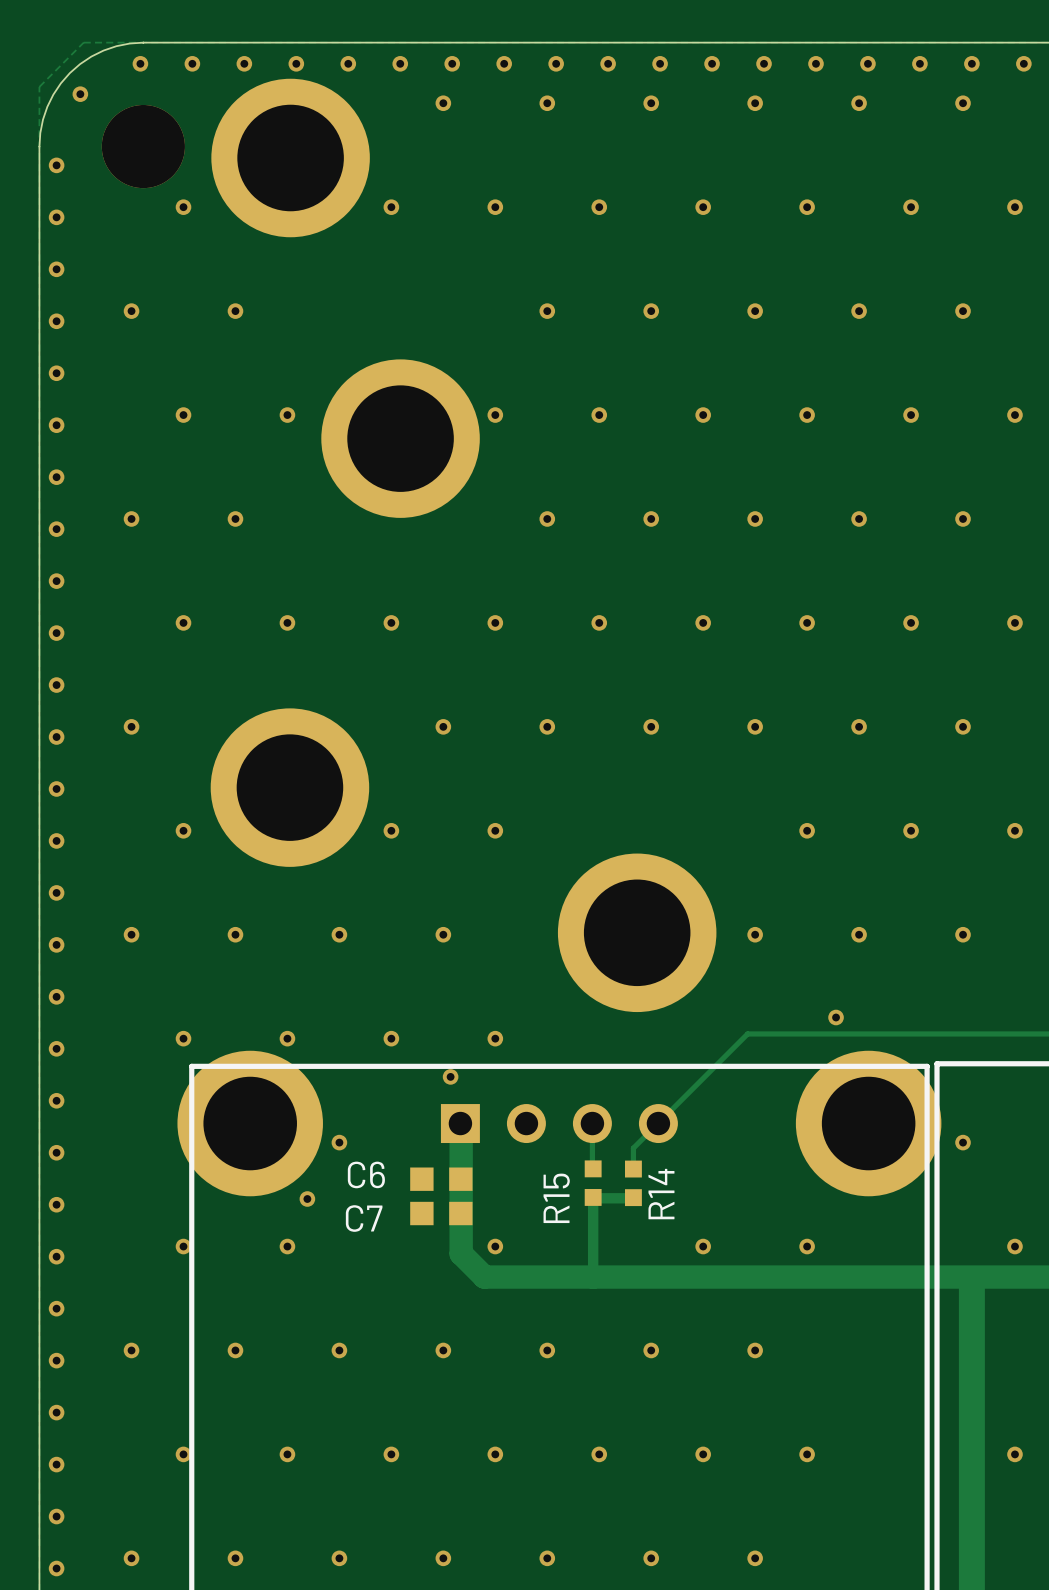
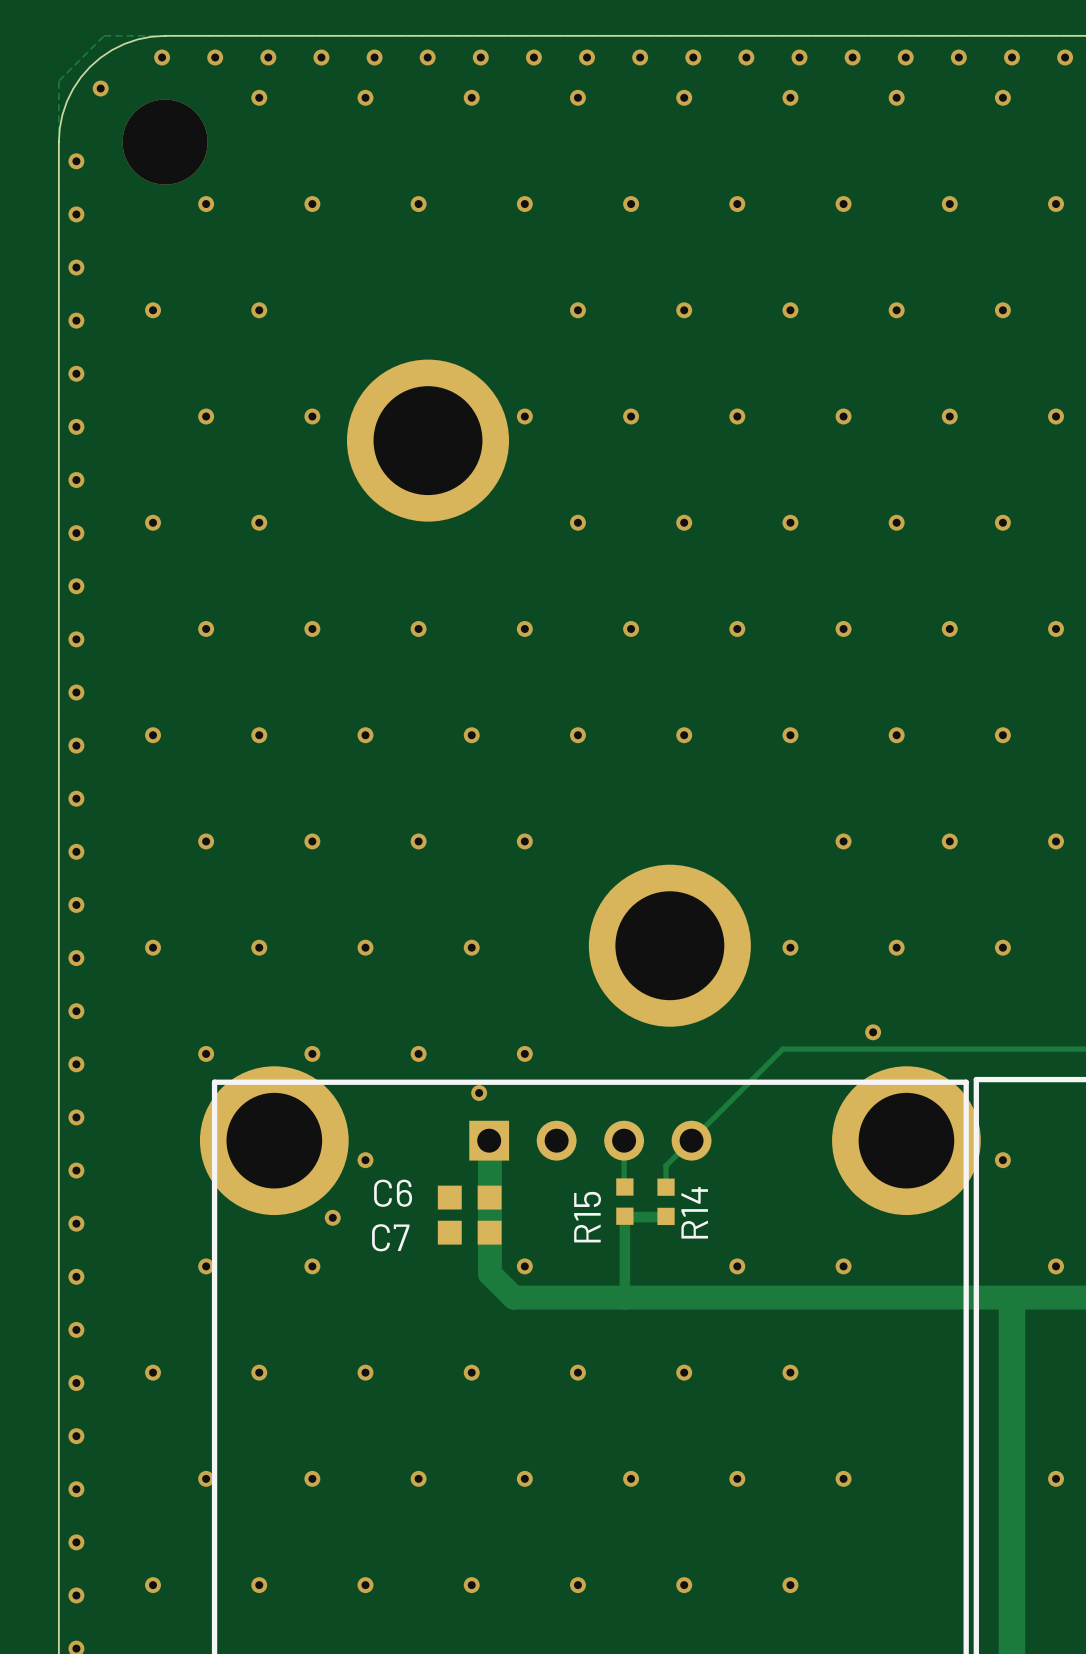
via: none -> (259, 97)
via: none -> (365, 97)
part: (290, 158) -> none
via: none -> (312, 204)
via: none -> (259, 735)
via: none -> (365, 735)
part: (289, 787) -> none
via: none -> (312, 841)

